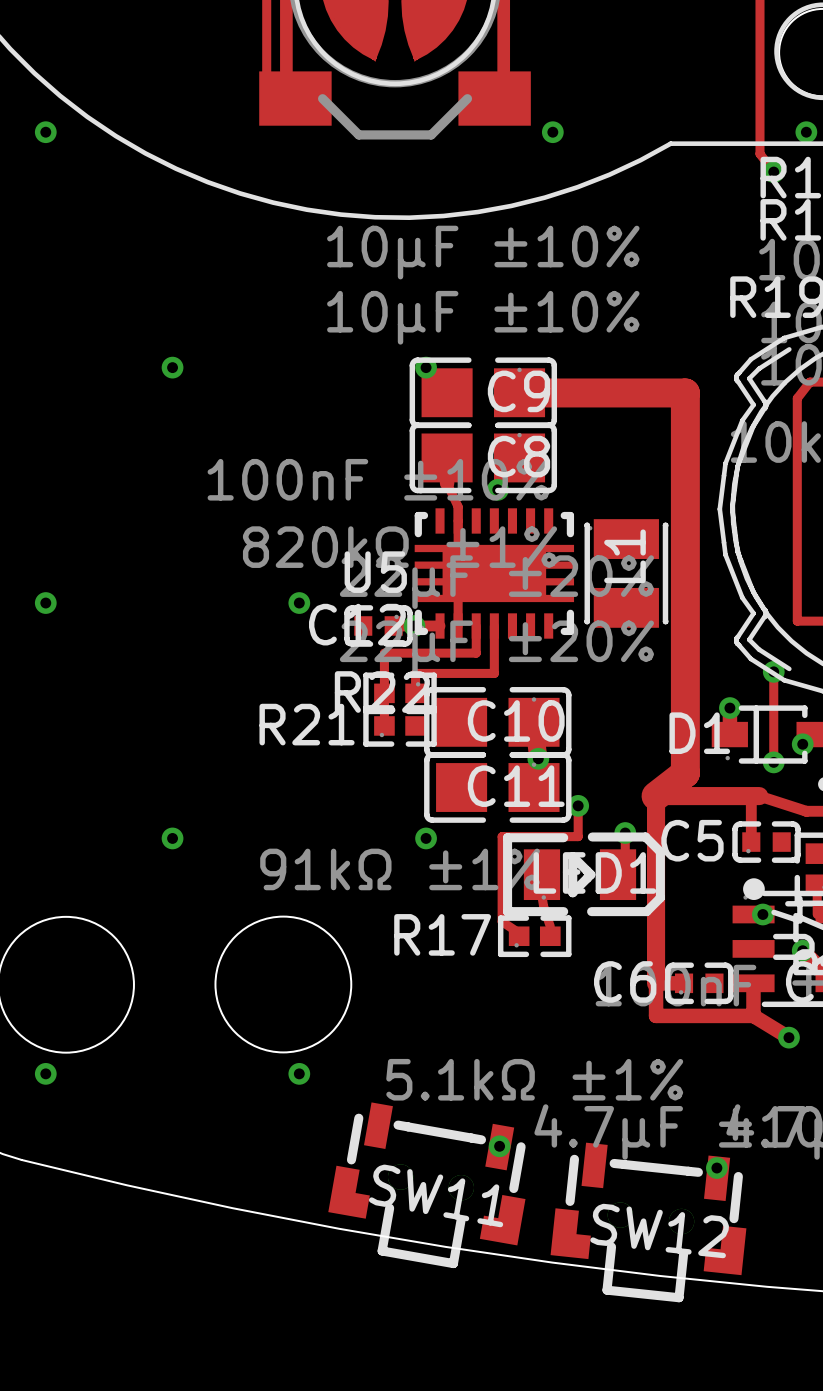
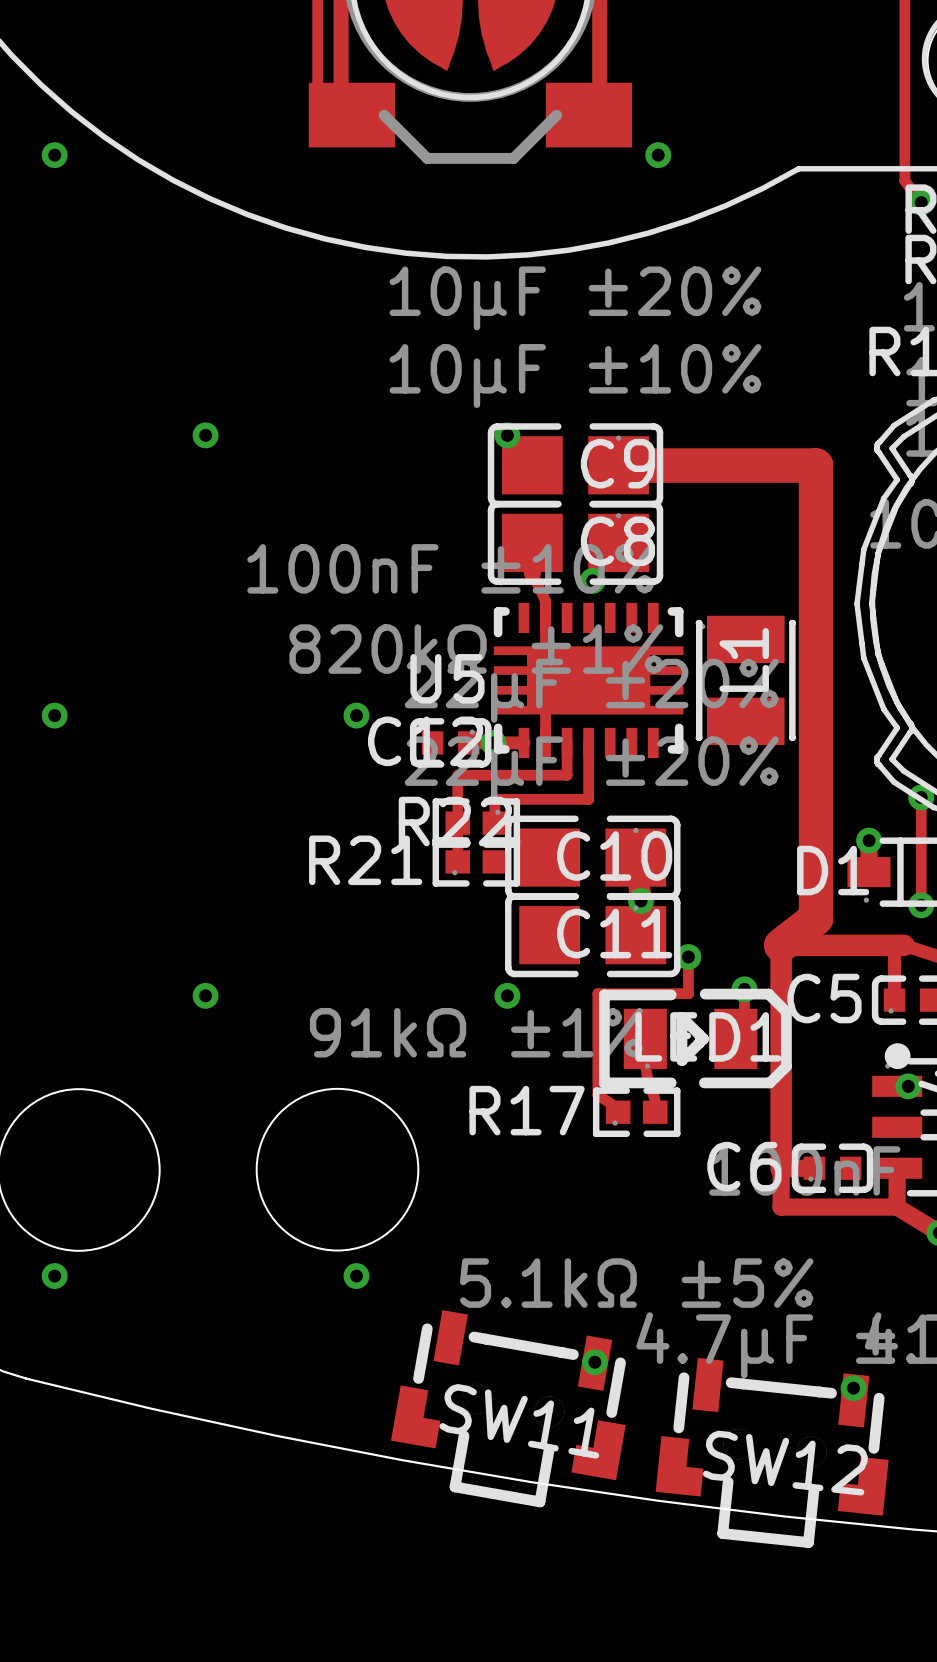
C9 value: 10µF ±10% (483, 252) -> 10µF ±20% (575, 298)
R17 value: 5.1kΩ ±1% (534, 1079) -> 5.1kΩ ±5% (636, 1283)

